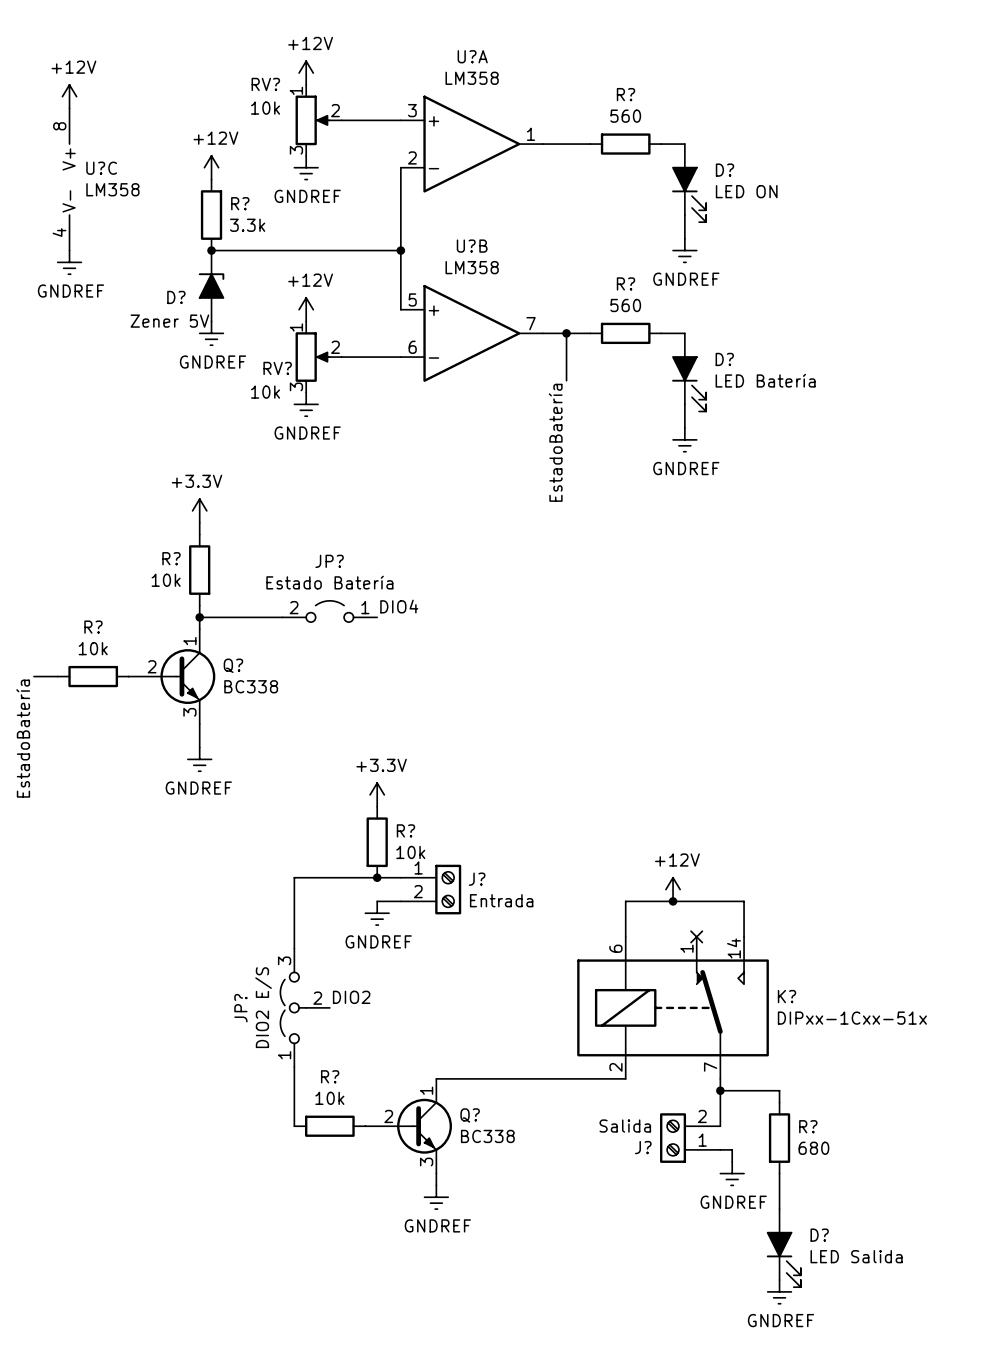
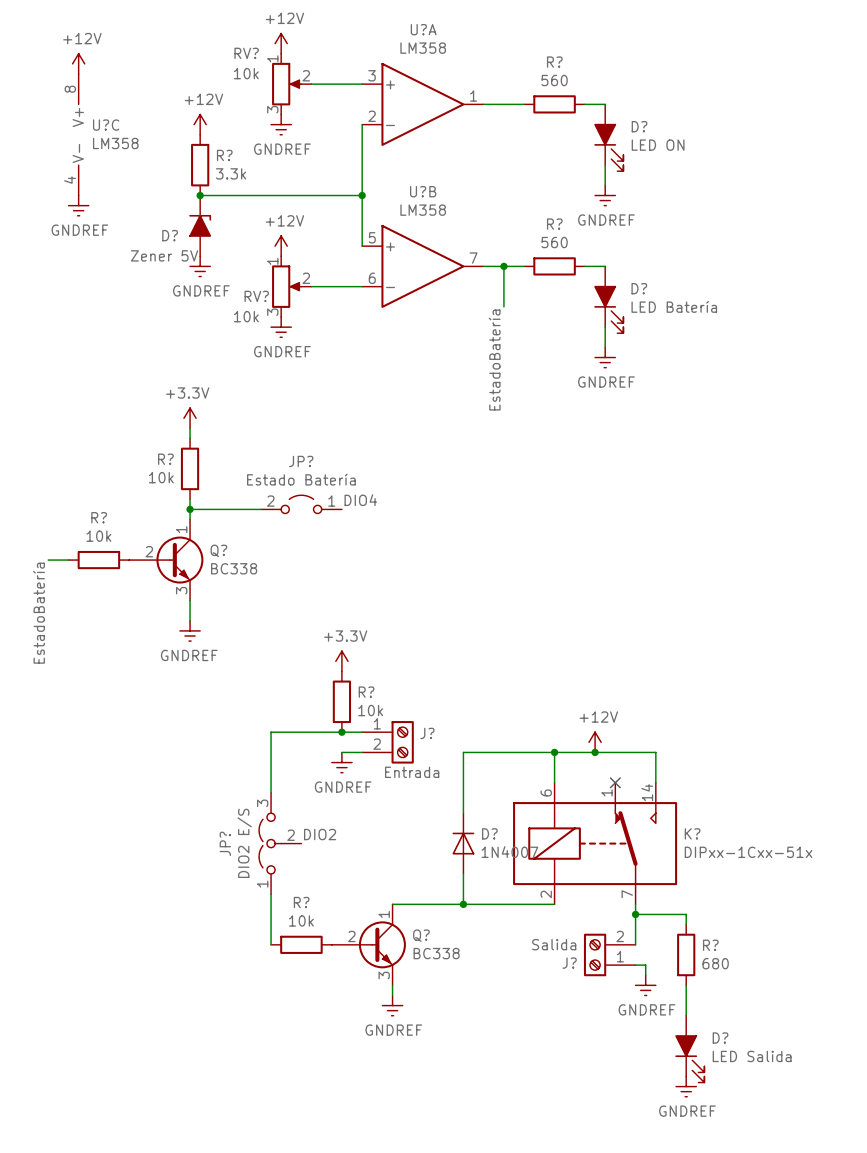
J? value position: Entrada (501, 900) -> Entrada (412, 772)
wire: none -> (554, 752) (463, 752) (463, 813)
junction: none -> (554, 752)
D?: none -> 1N4007 (463, 843)
wire: none -> (463, 873) (463, 904)
junction: none -> (463, 904)

